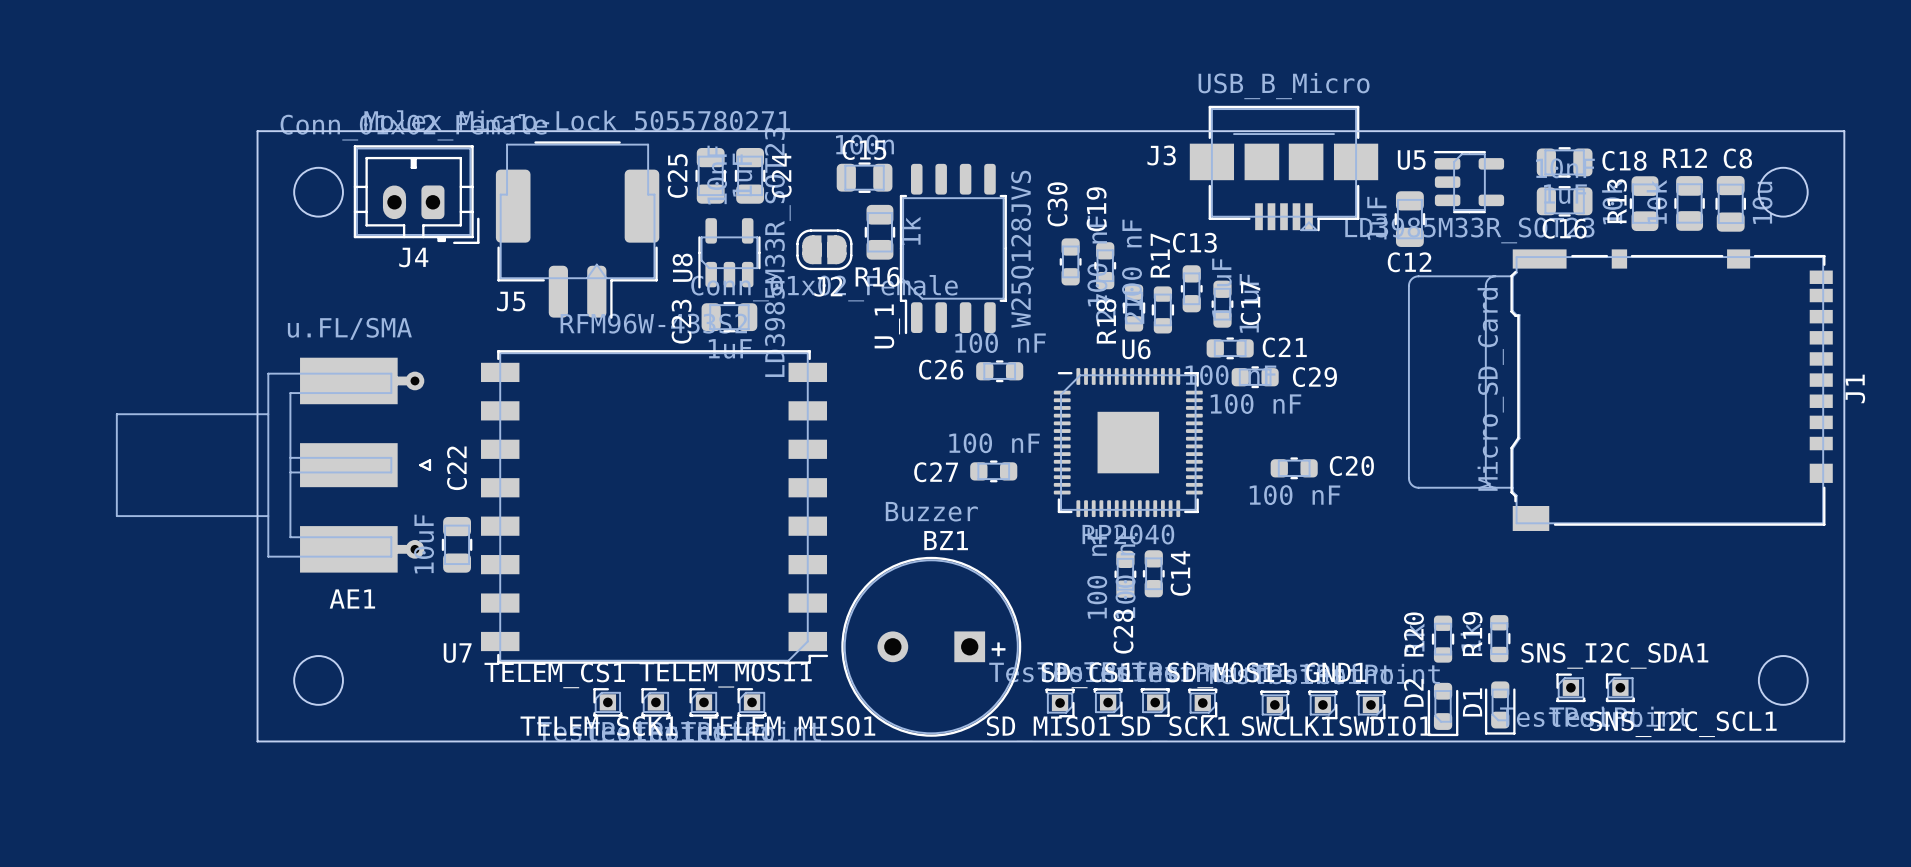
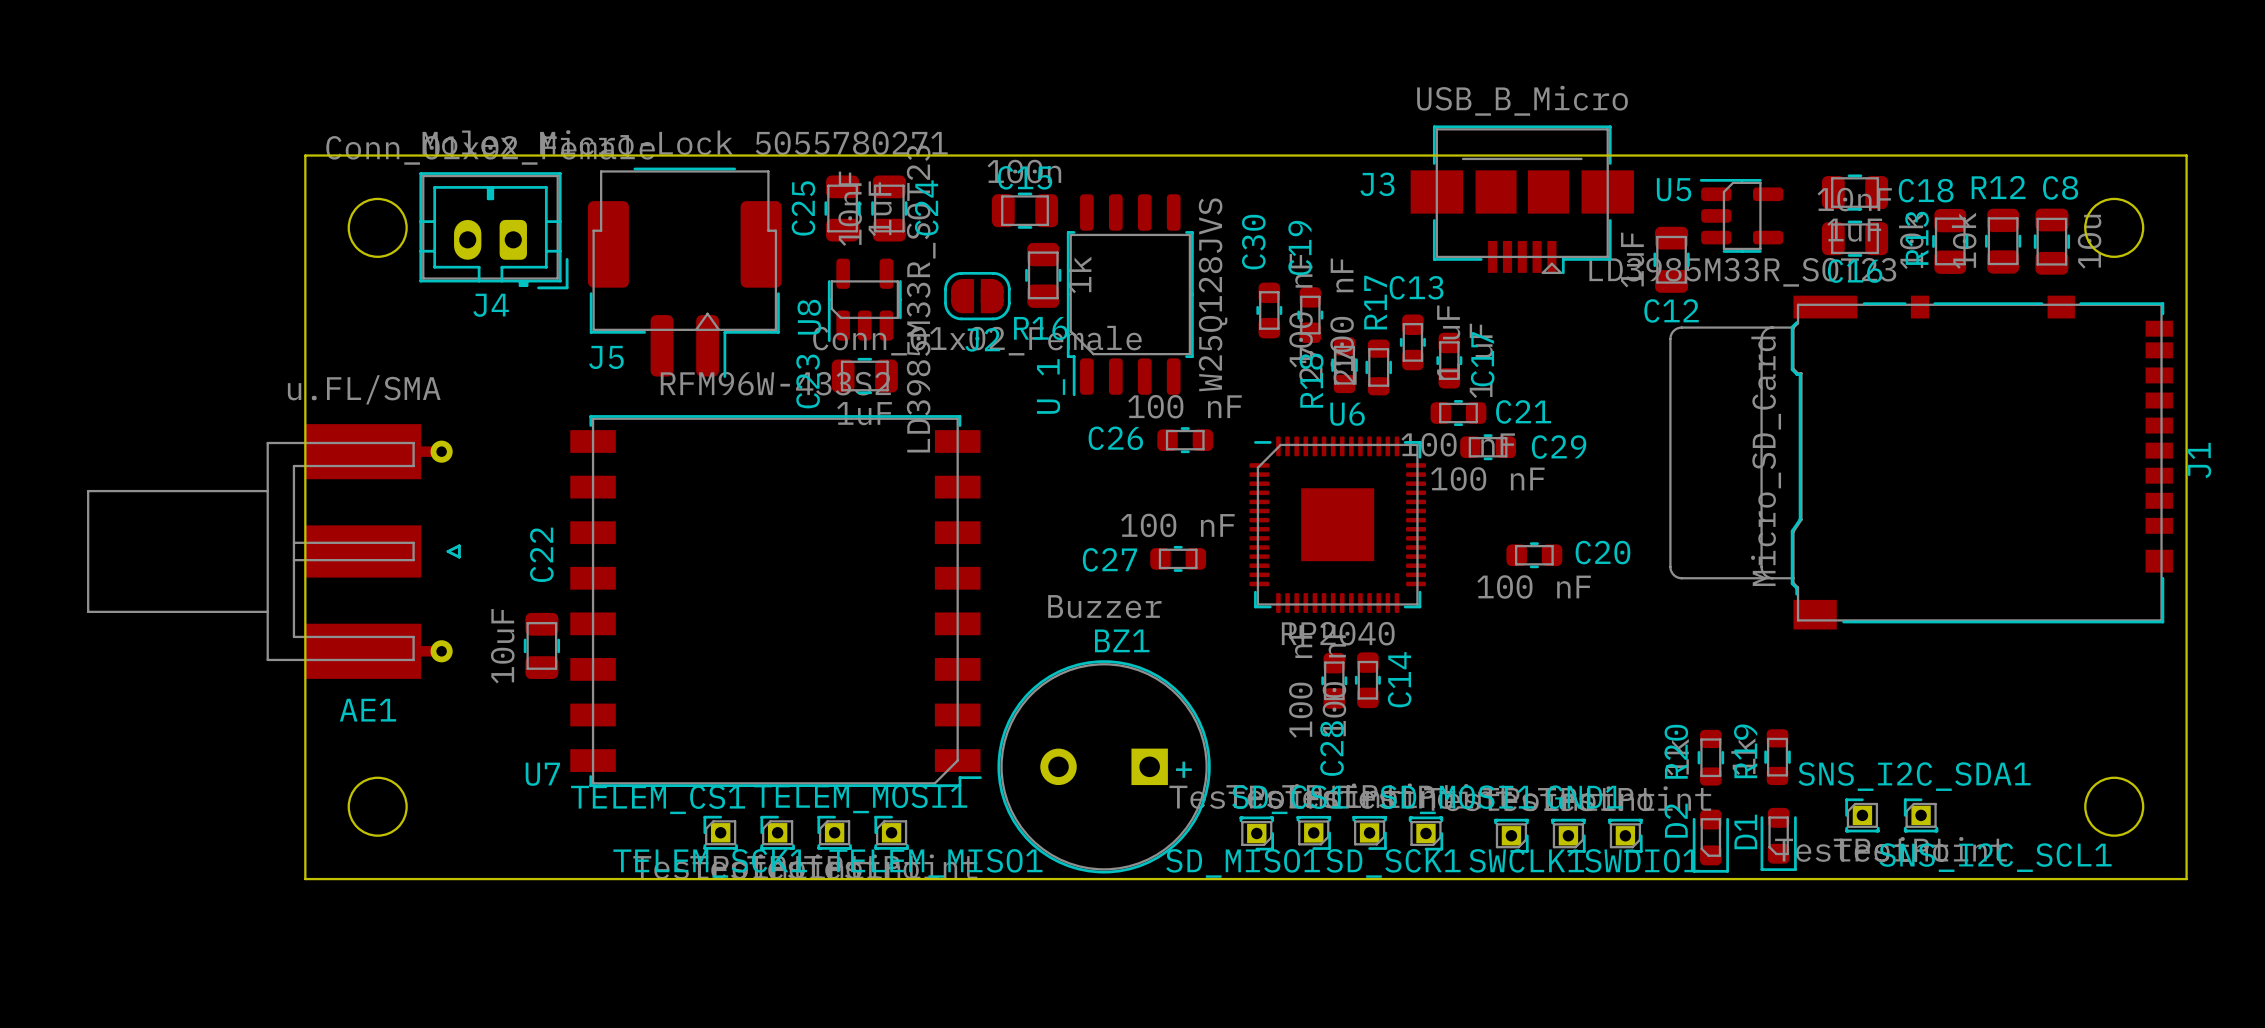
AE1 position: (273, 465) -> (273, 551)

